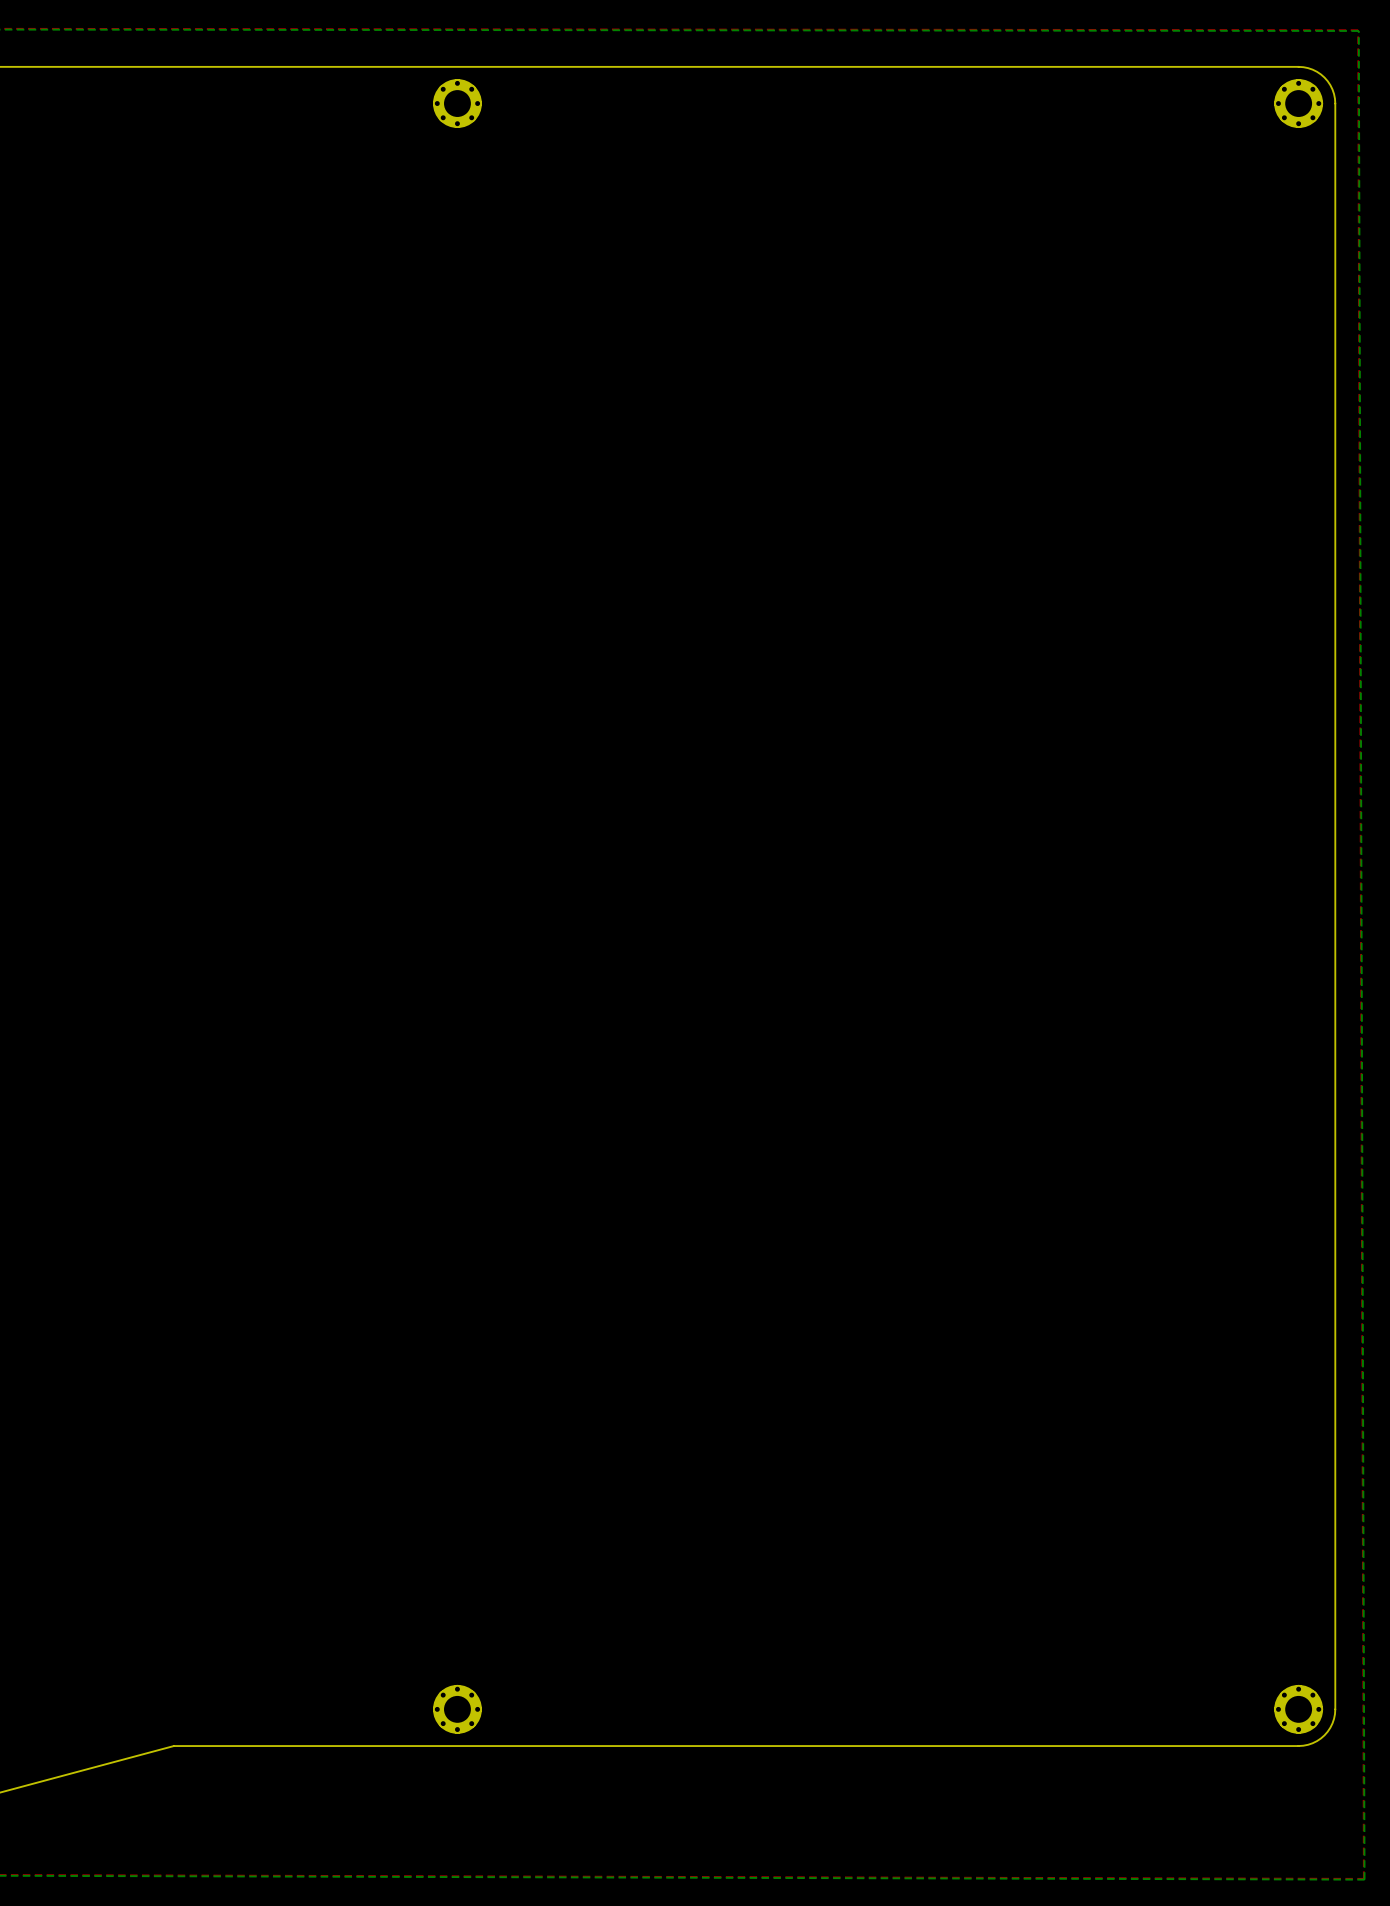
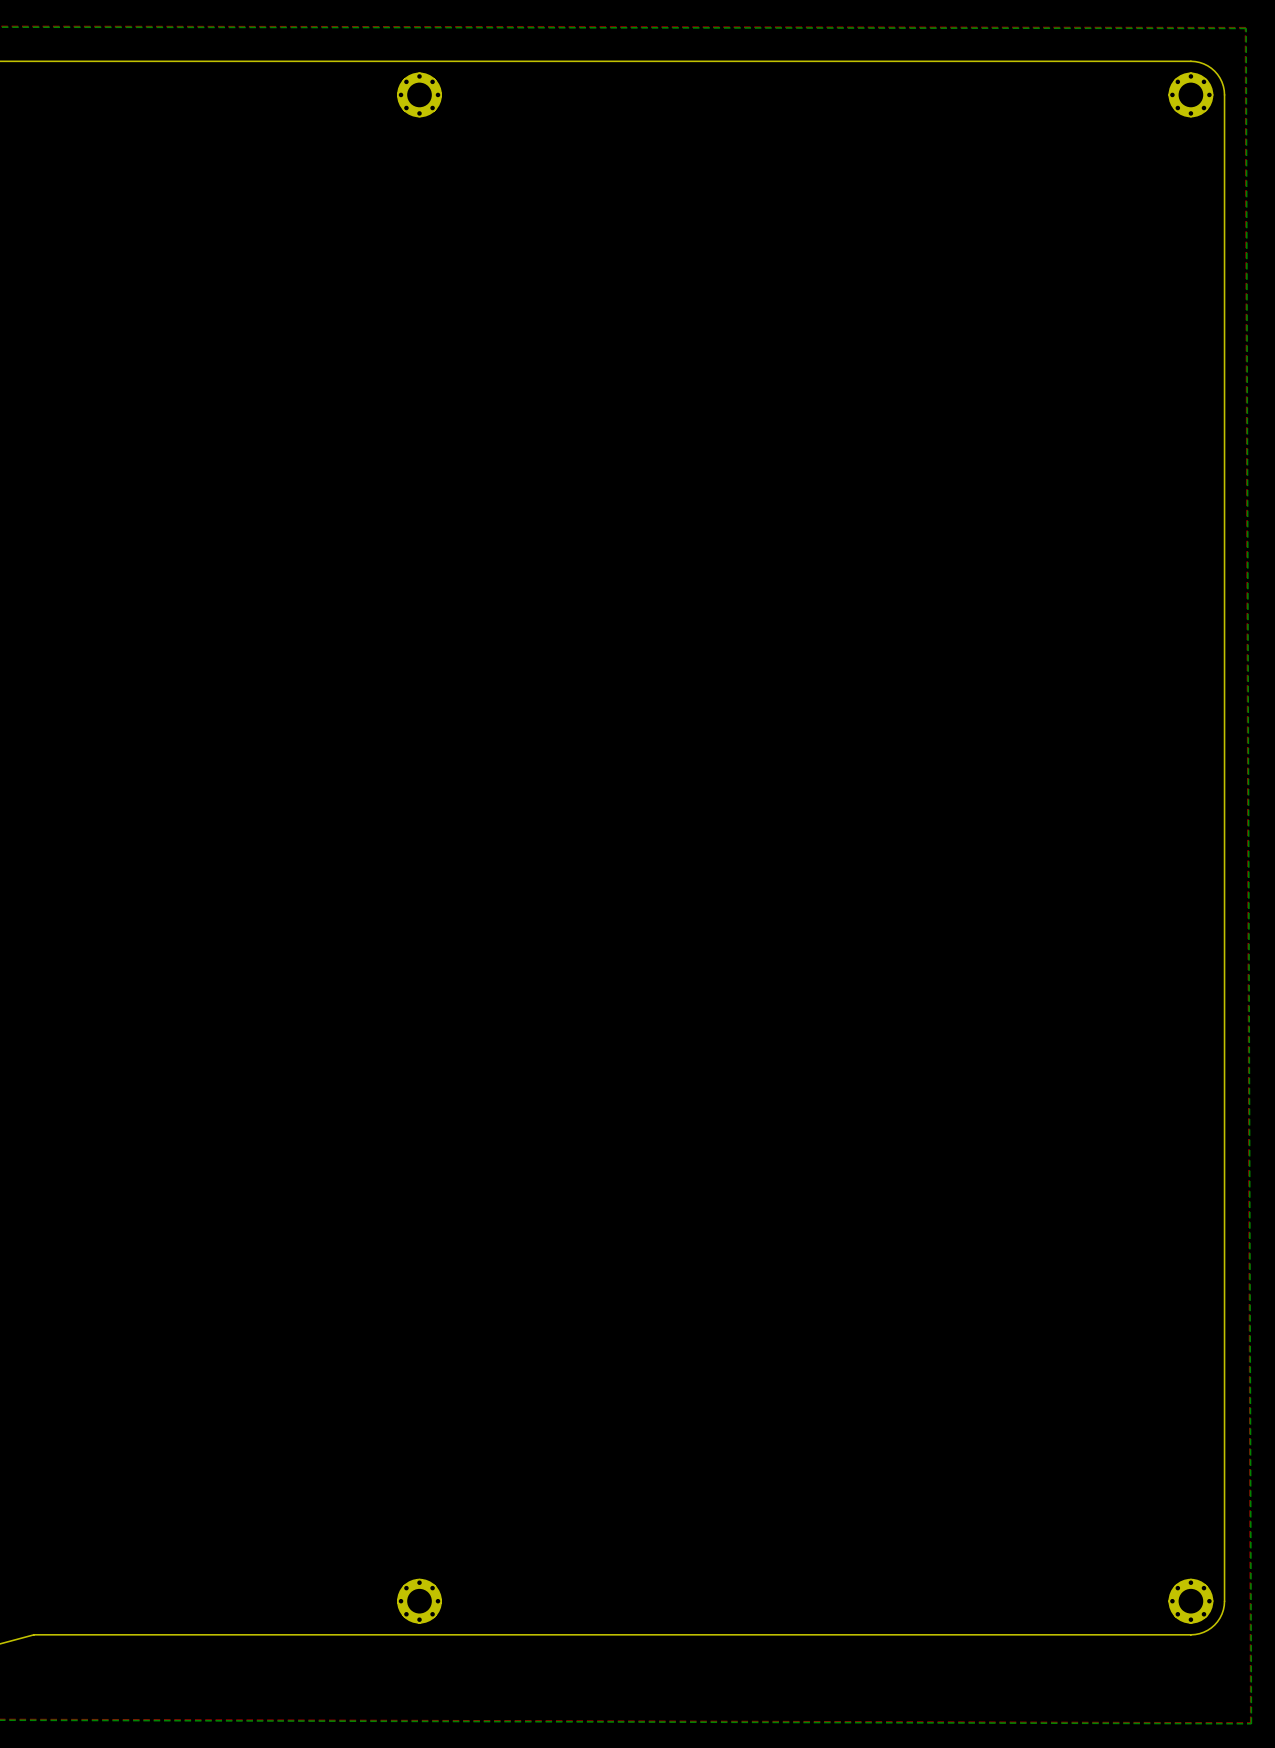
part position: (457, 1709) -> (419, 1601)
part position: (1298, 1709) -> (1190, 1601)
board edge: (1335, 1709) (1332, 1723) (1324, 1735) (1312, 1743) (1298, 1746) (173, 1746) (37, 1782) -> (1224, 1567) (1224, 1605) (1220, 1618) (1207, 1630) (1190, 1634) (33, 1634)

